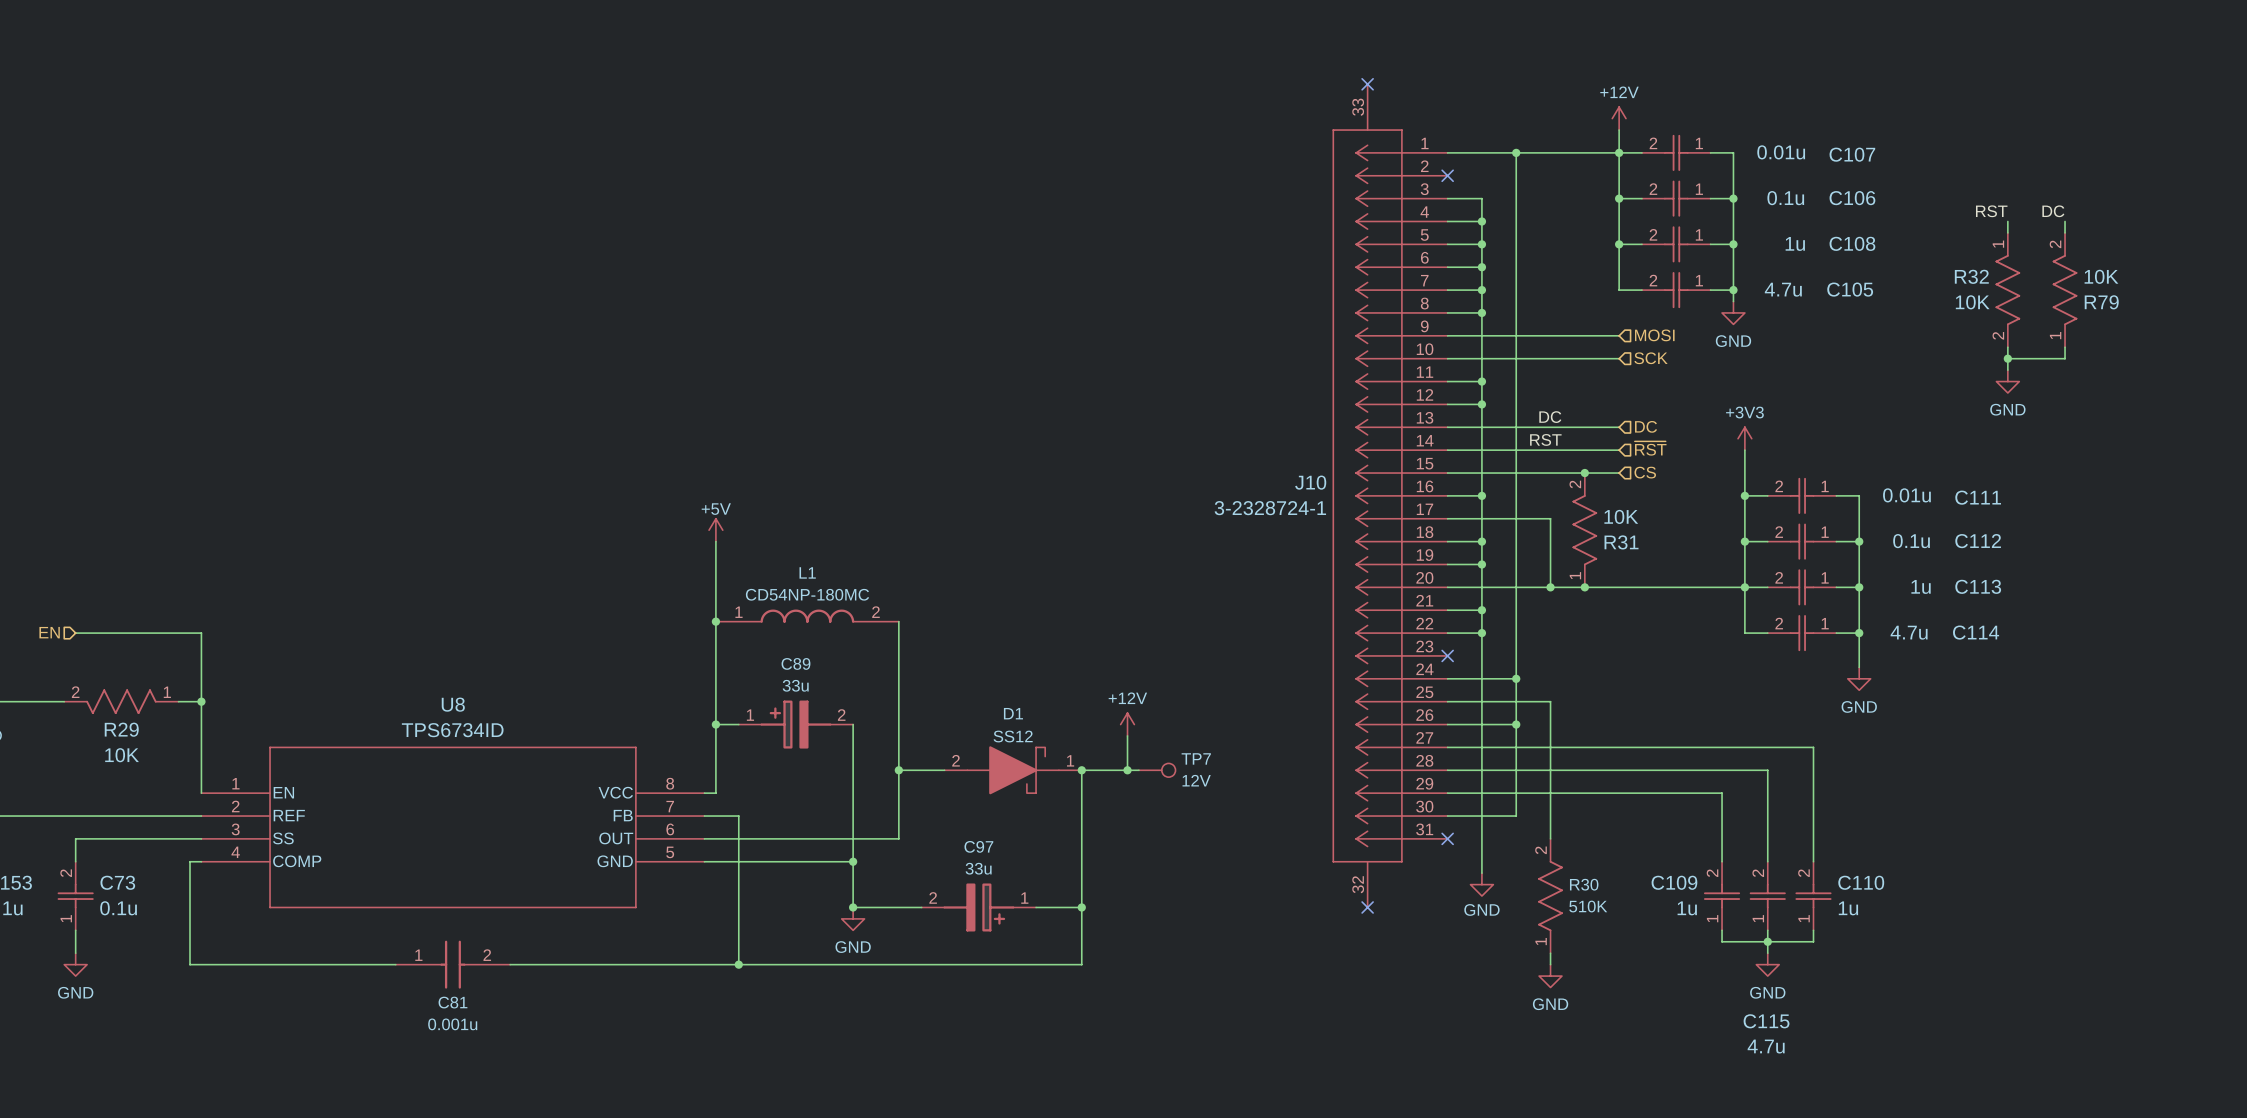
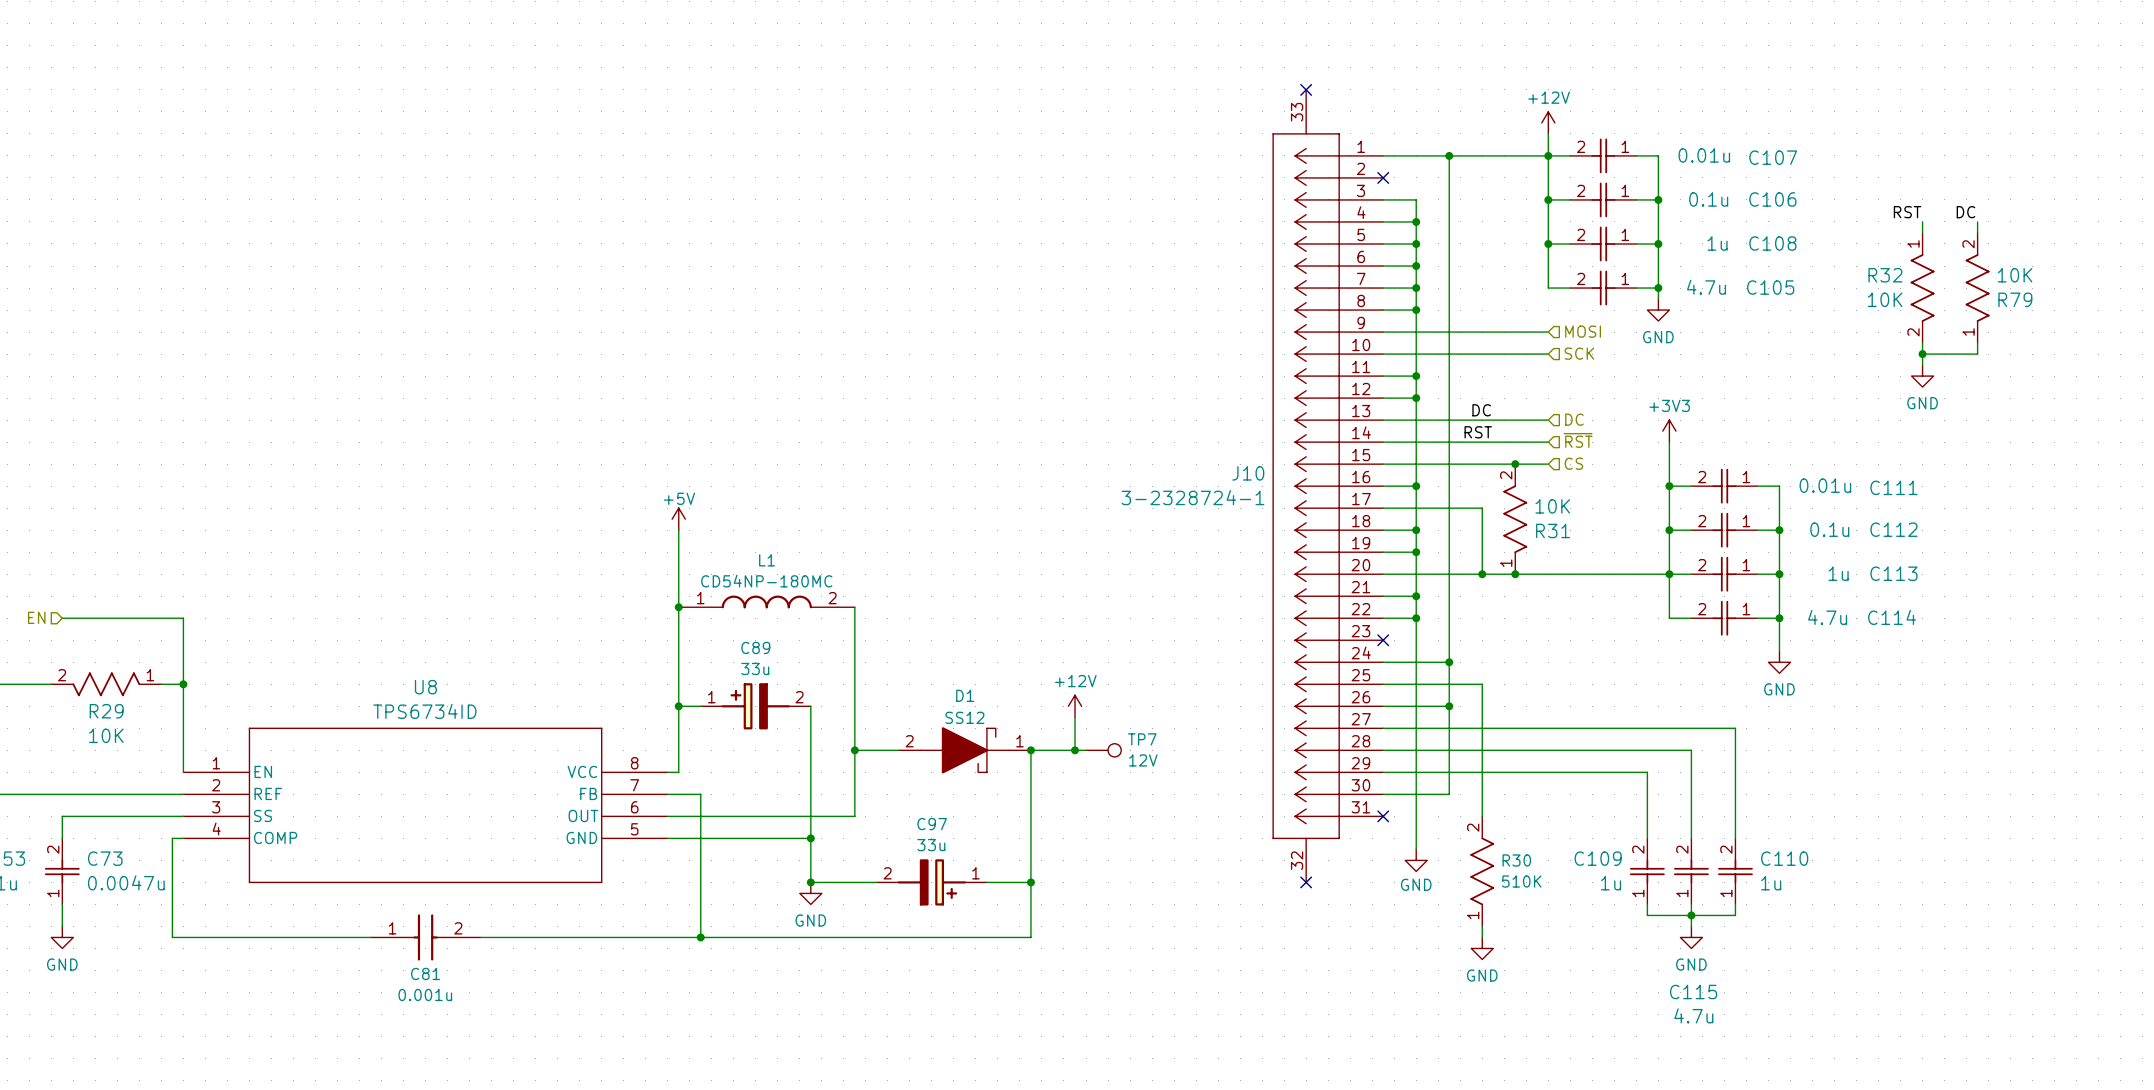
C73 value: 0.1u (118, 908) -> 0.0047u (126, 882)

